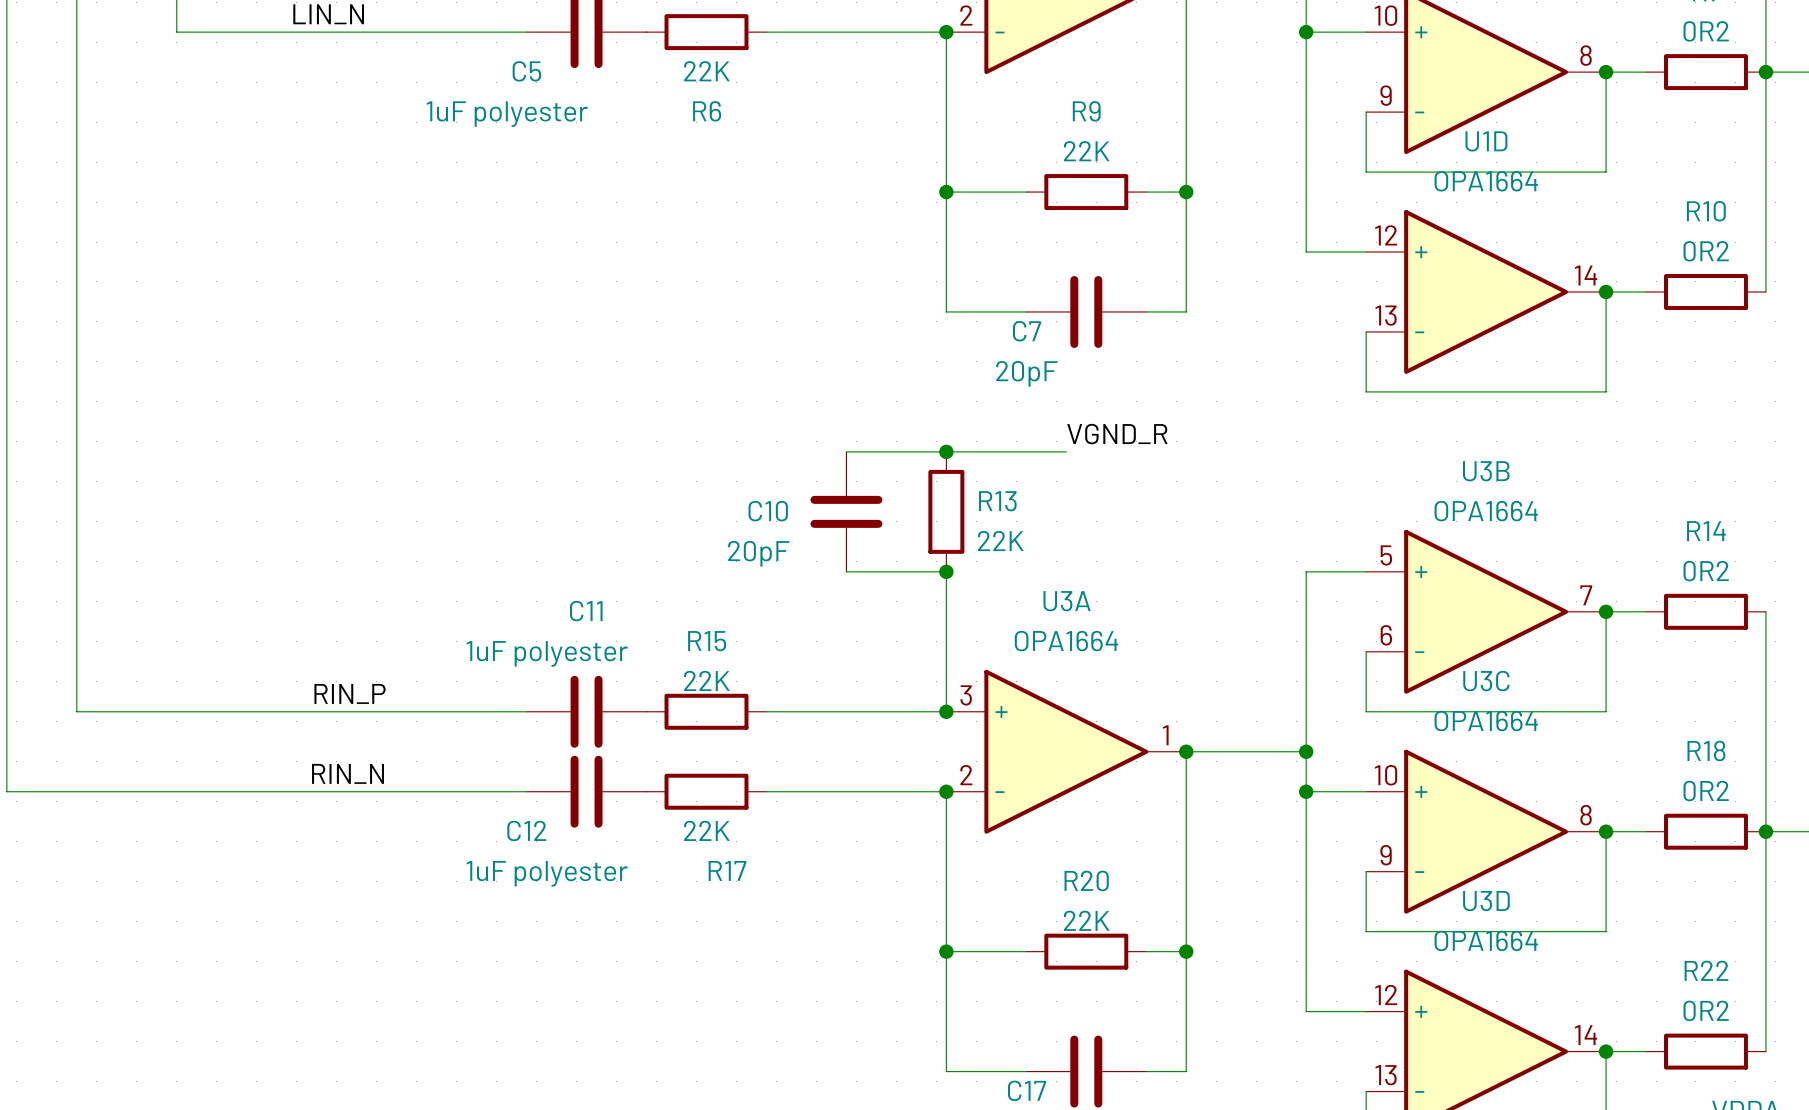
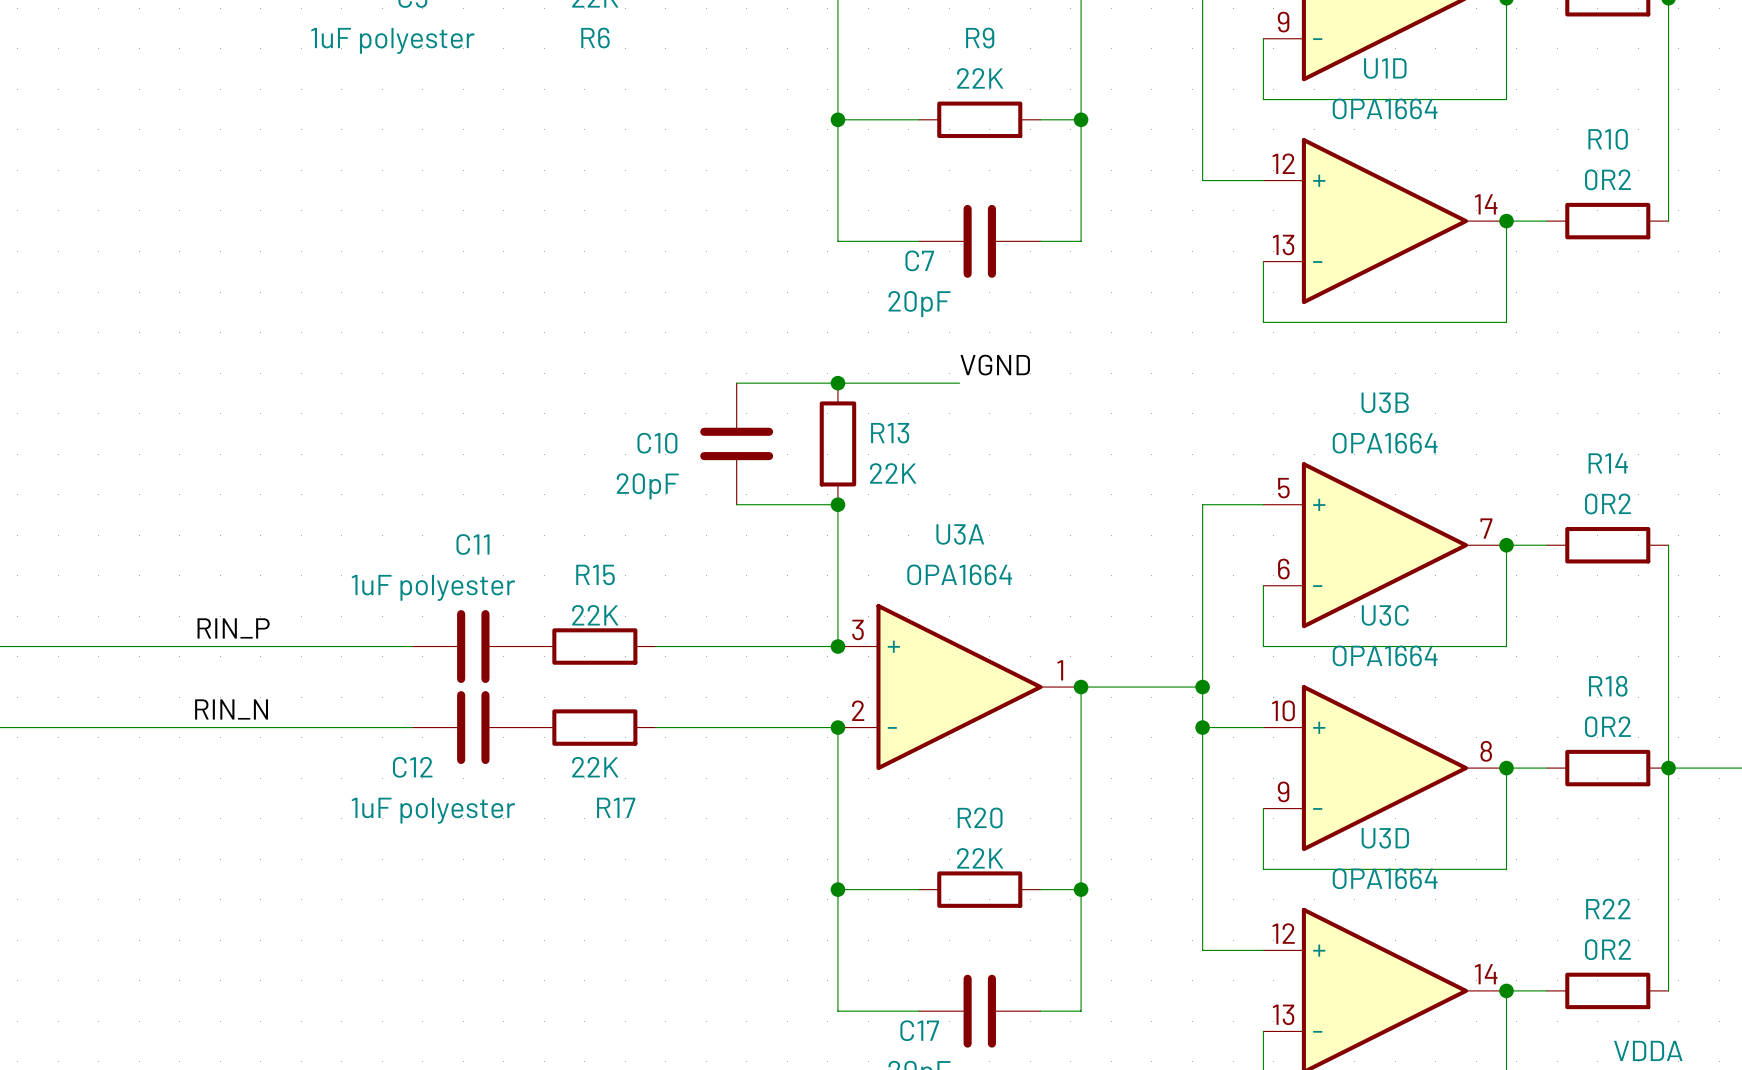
label: VGND_R (1117, 434) -> VGND (995, 365)

